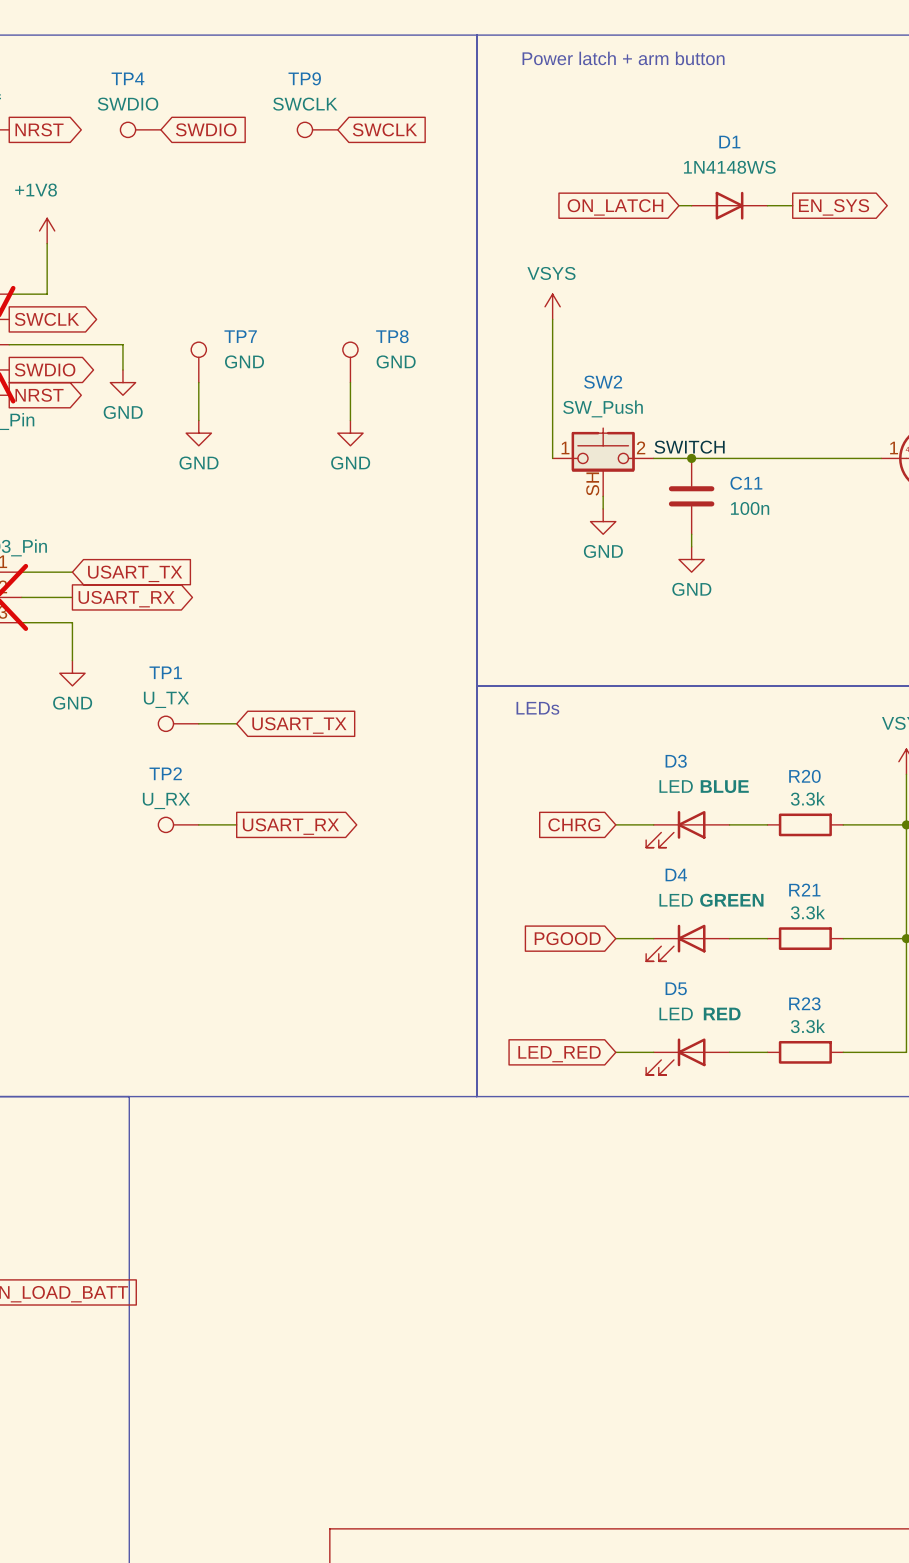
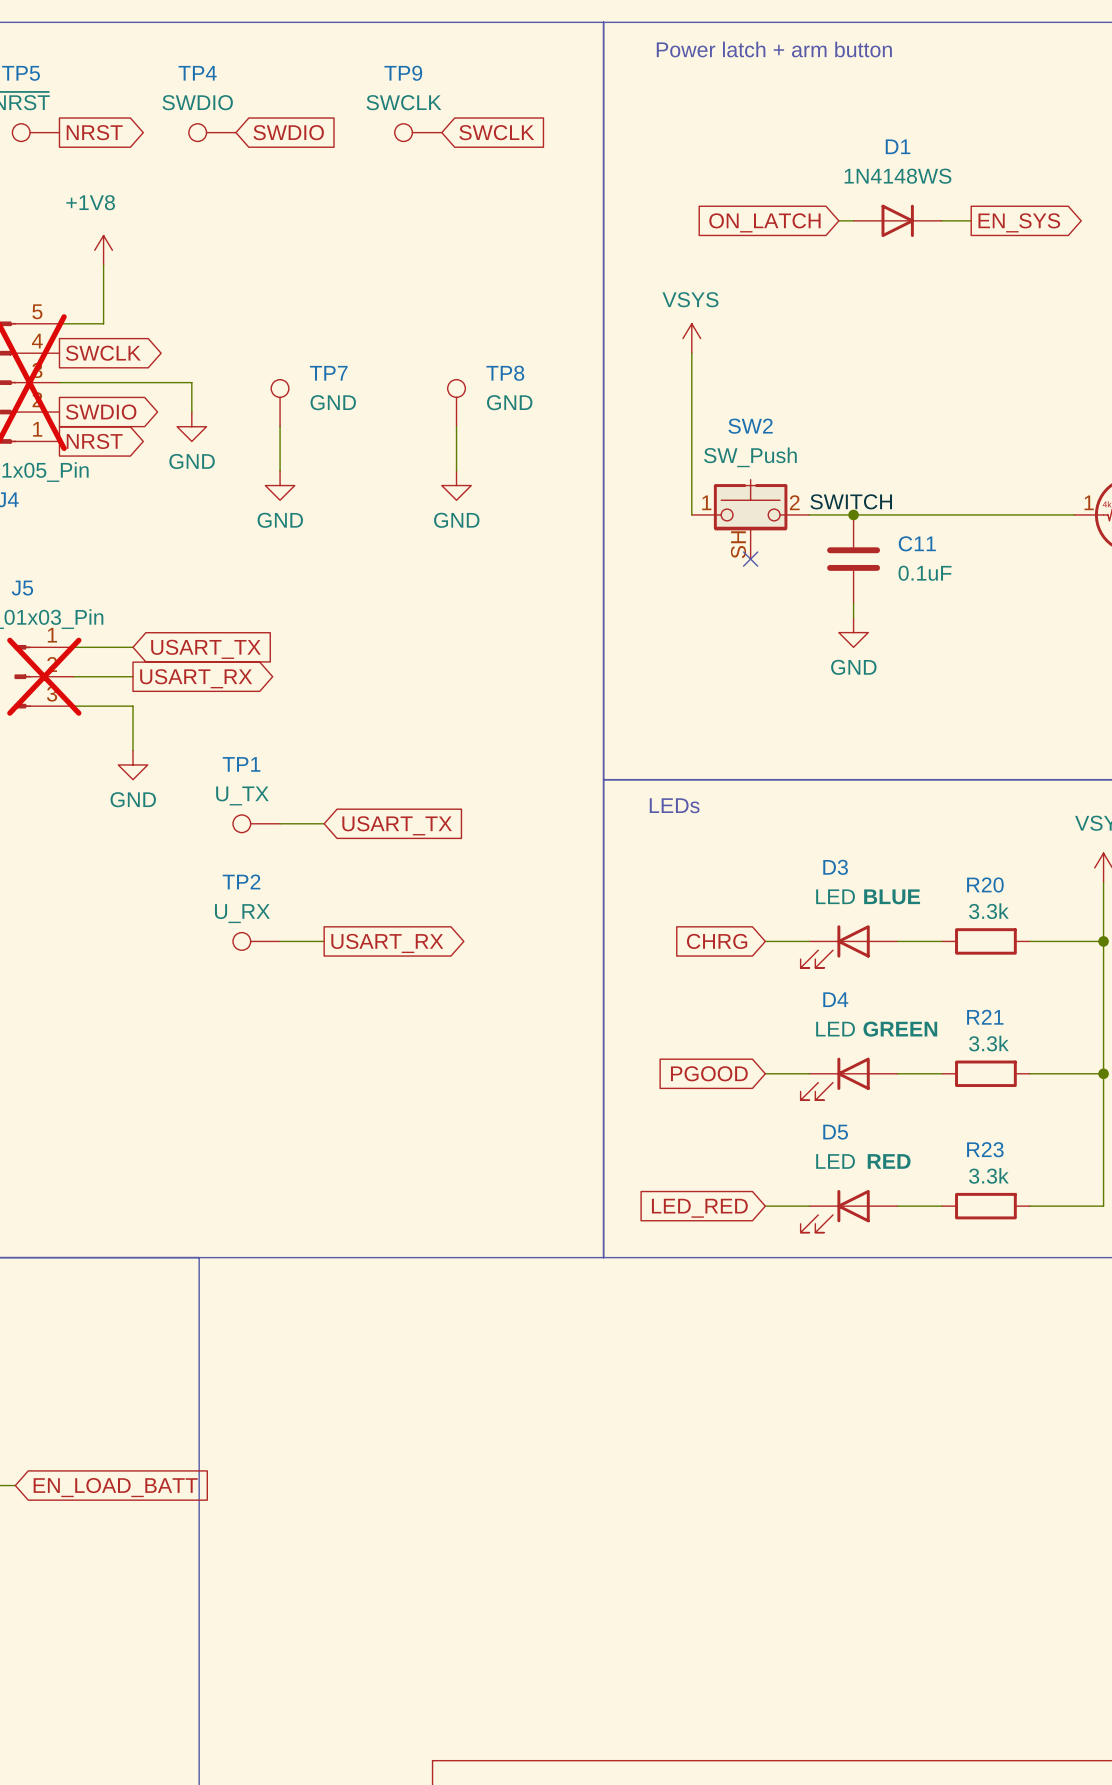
wire: (603, 496) (603, 508) -> none
no-connect mark: none -> (750, 559)
C11 value: 100n (750, 508) -> 0.1uF (925, 573)
power symbol: GND (603, 521) -> none

